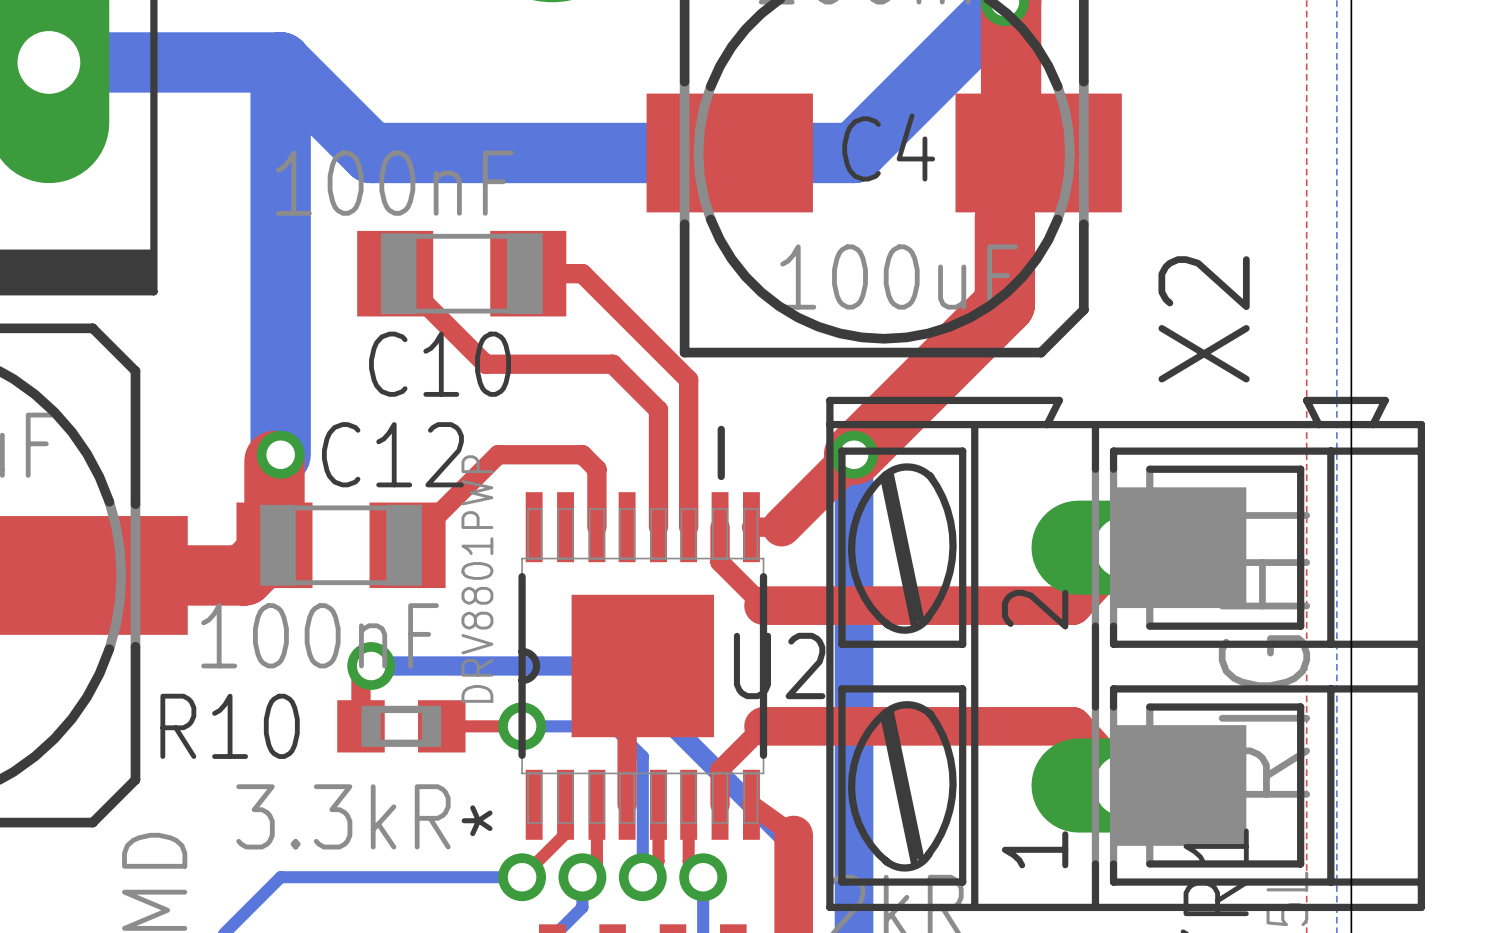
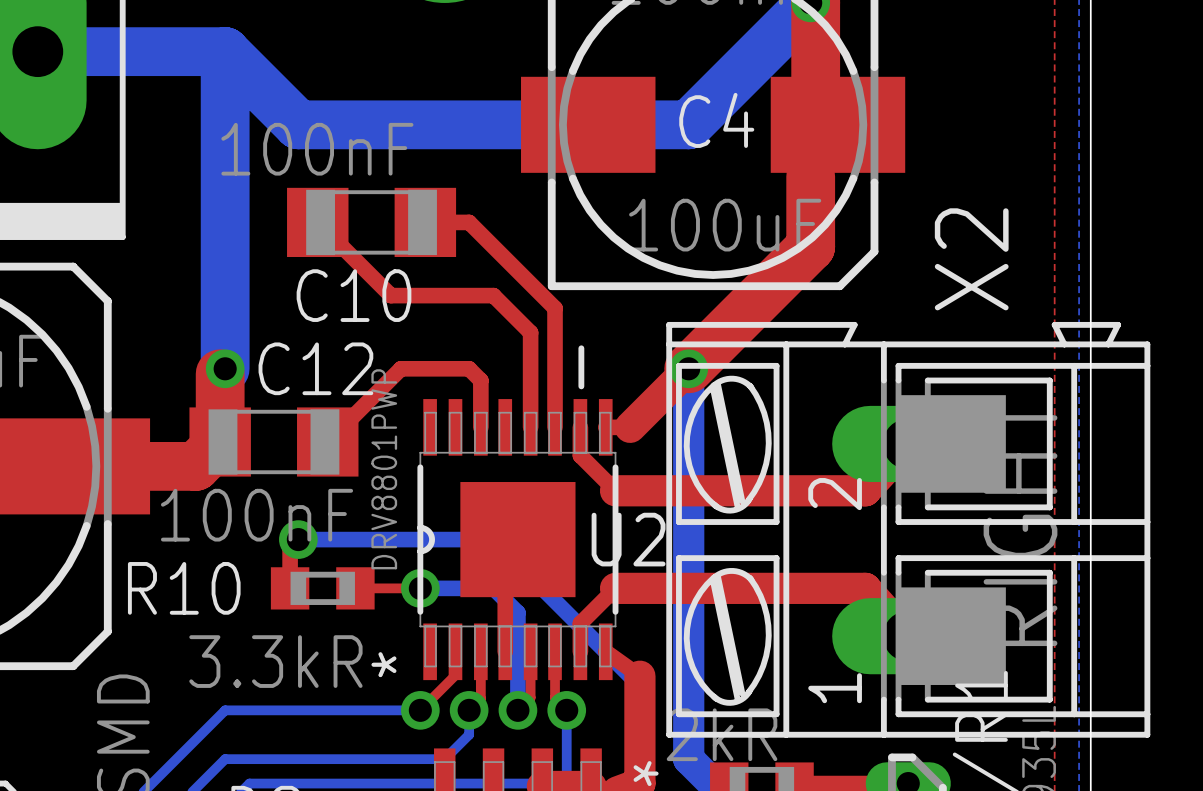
bottom track width: thin (522, 726) (612, 726) (642, 756) (642, 877) -> thick (420, 588) (493, 588) (517, 612) (517, 710)

